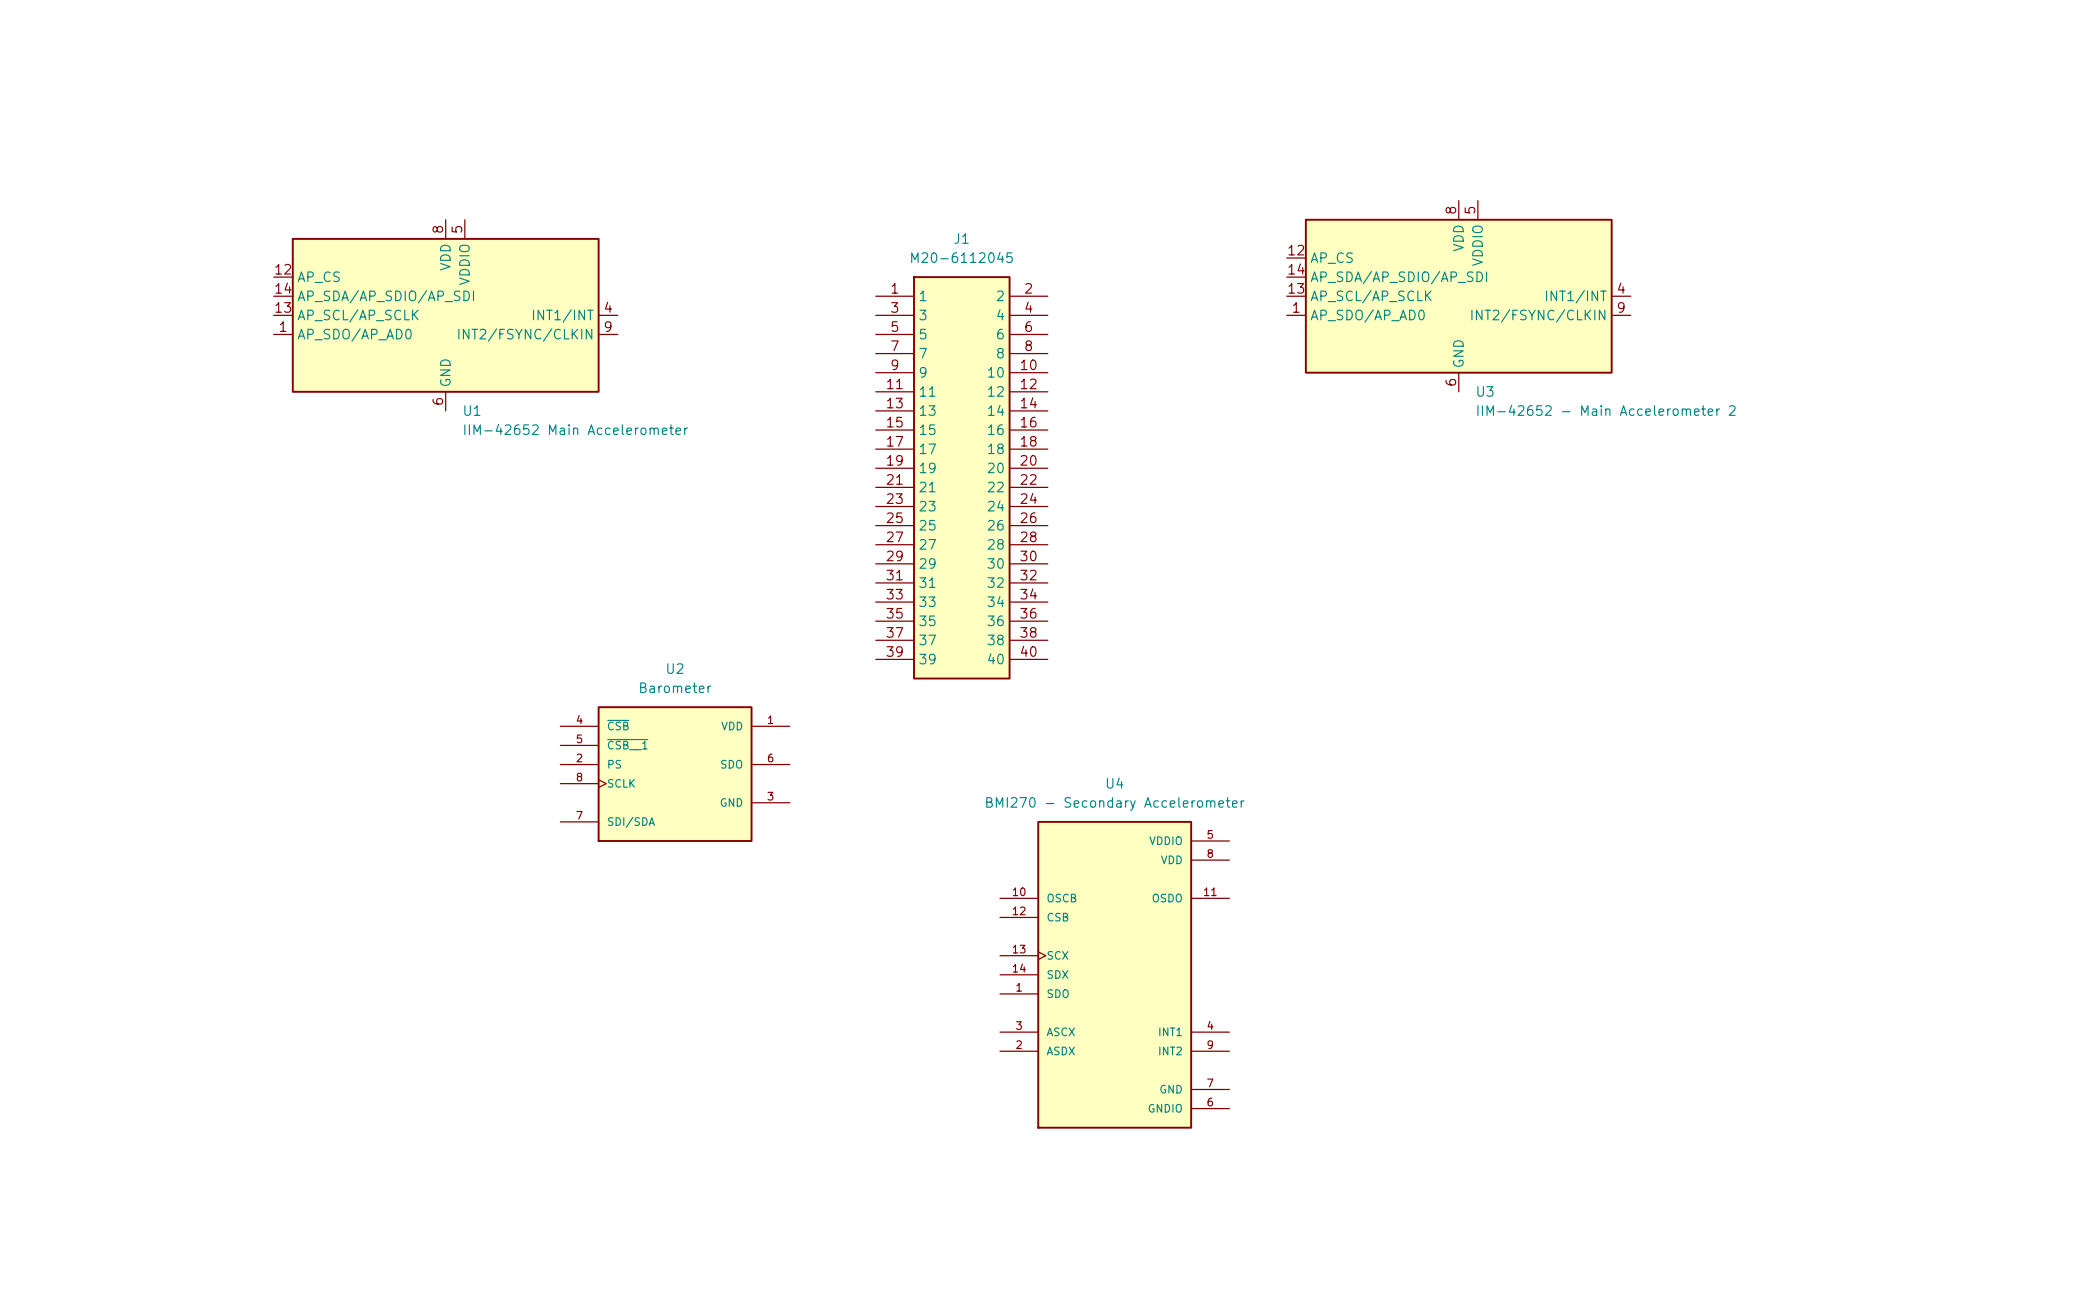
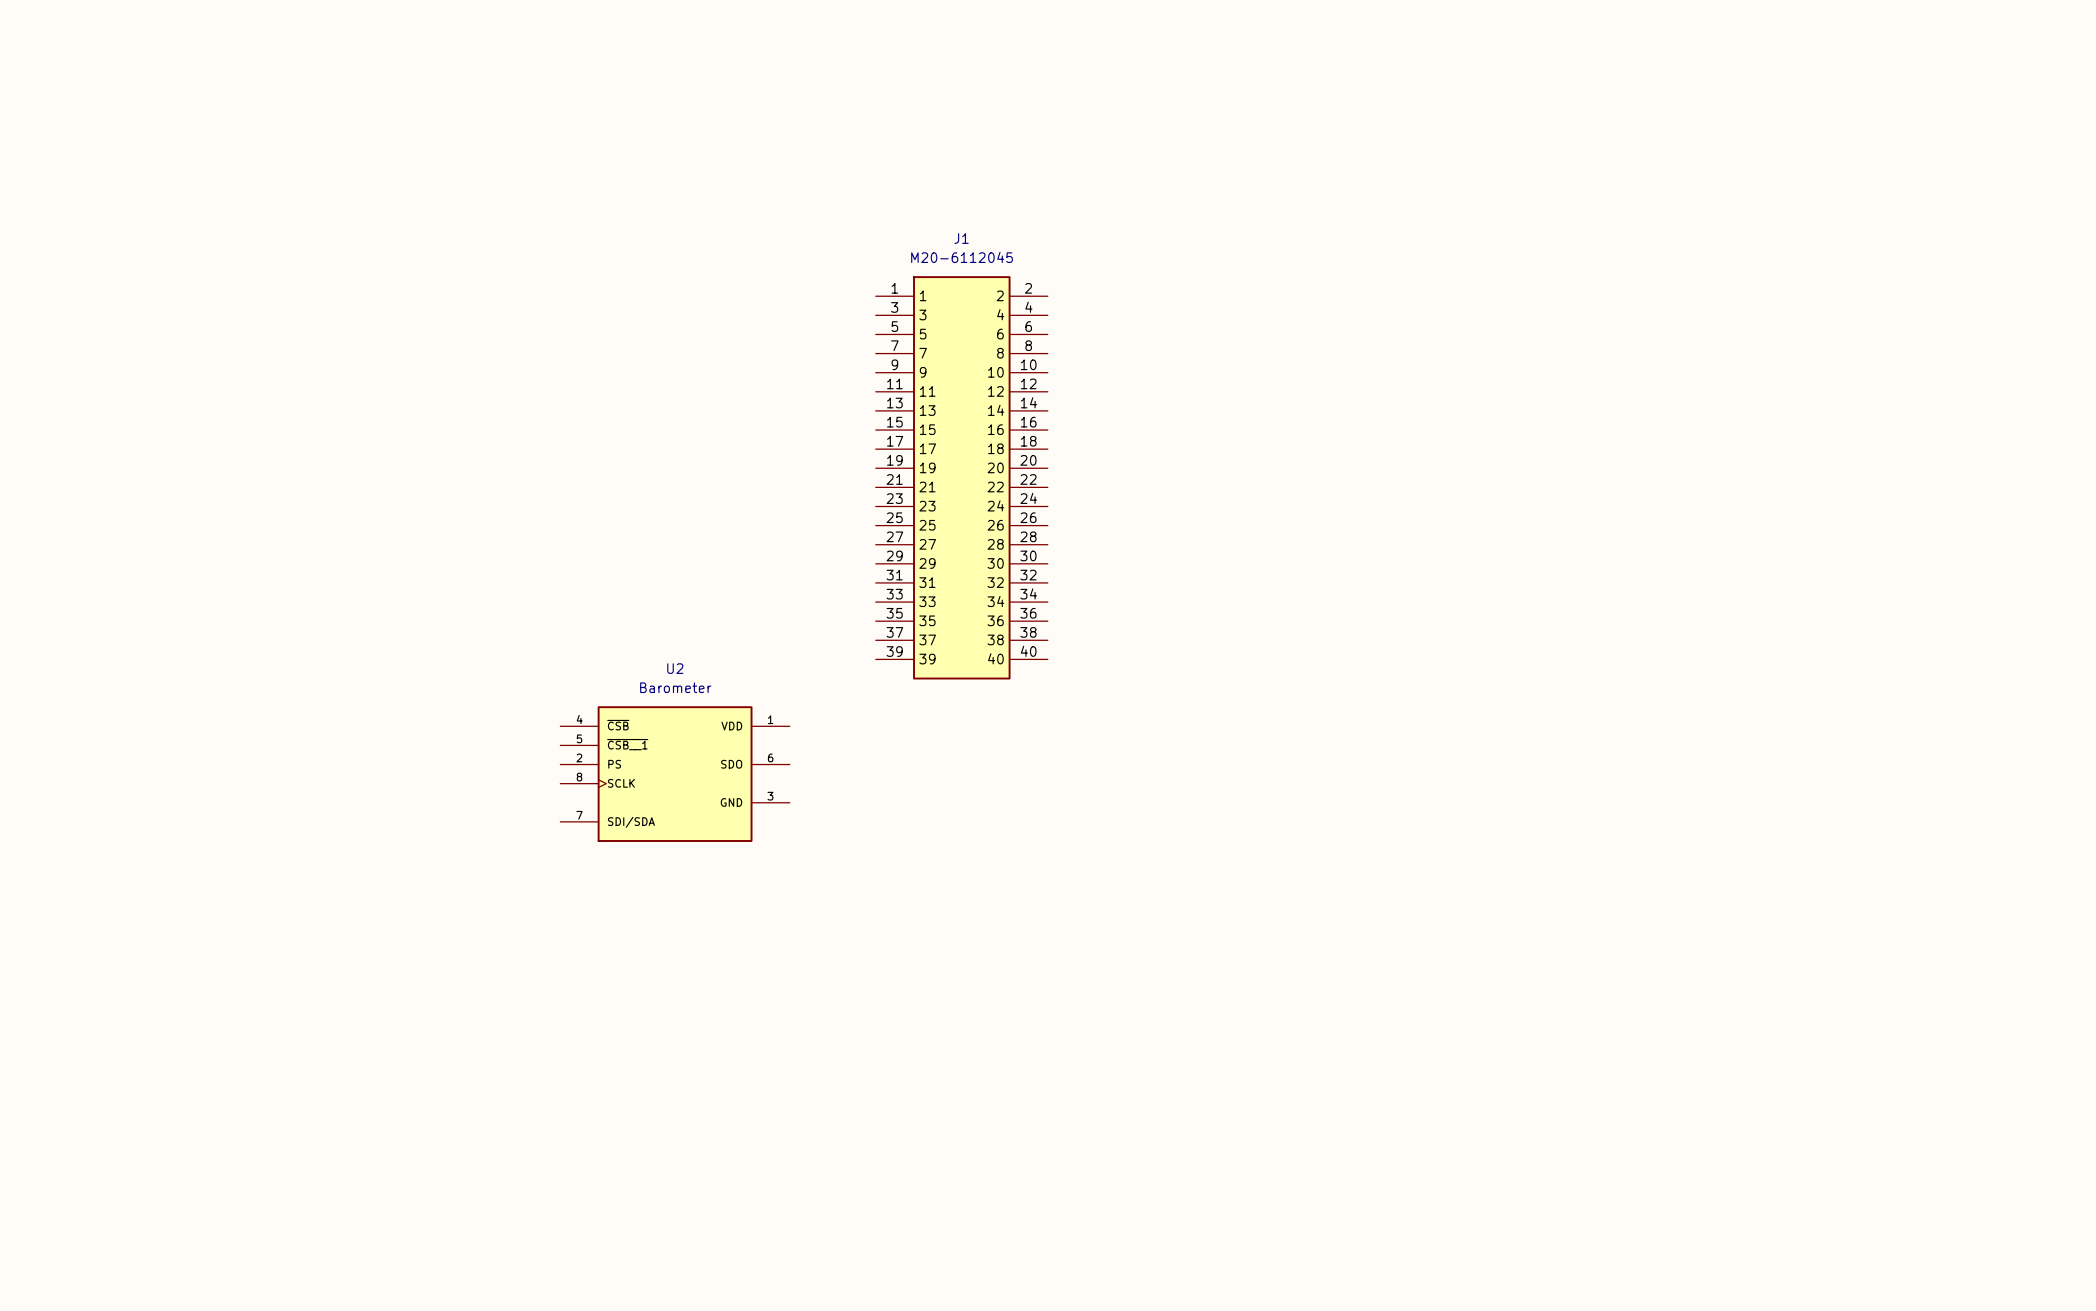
U3: IIM-42652 - Main Accelerometer 2 (1458, 296) -> none
U1: IIM-42652 Main Accelerometer (445, 315) -> none
U4: BMI270 - Secondary Accelerometer (1114, 974) -> none

